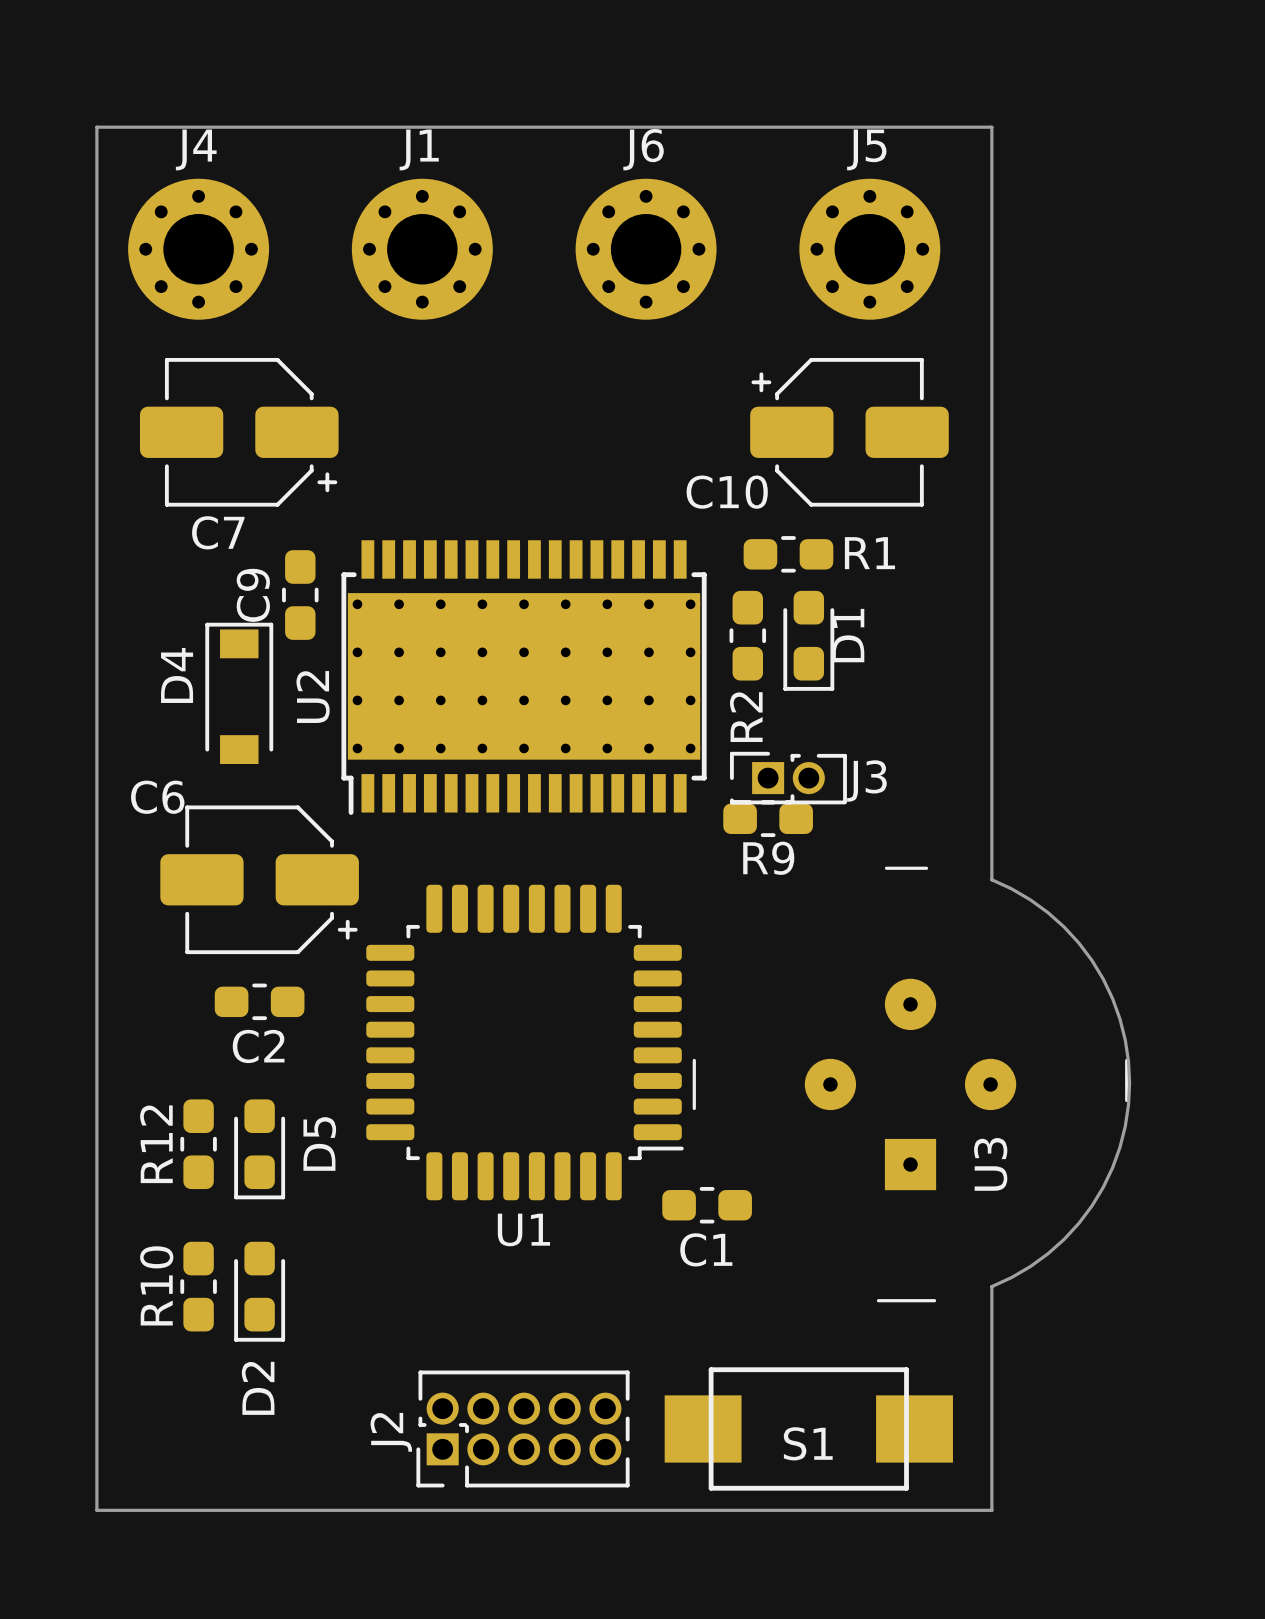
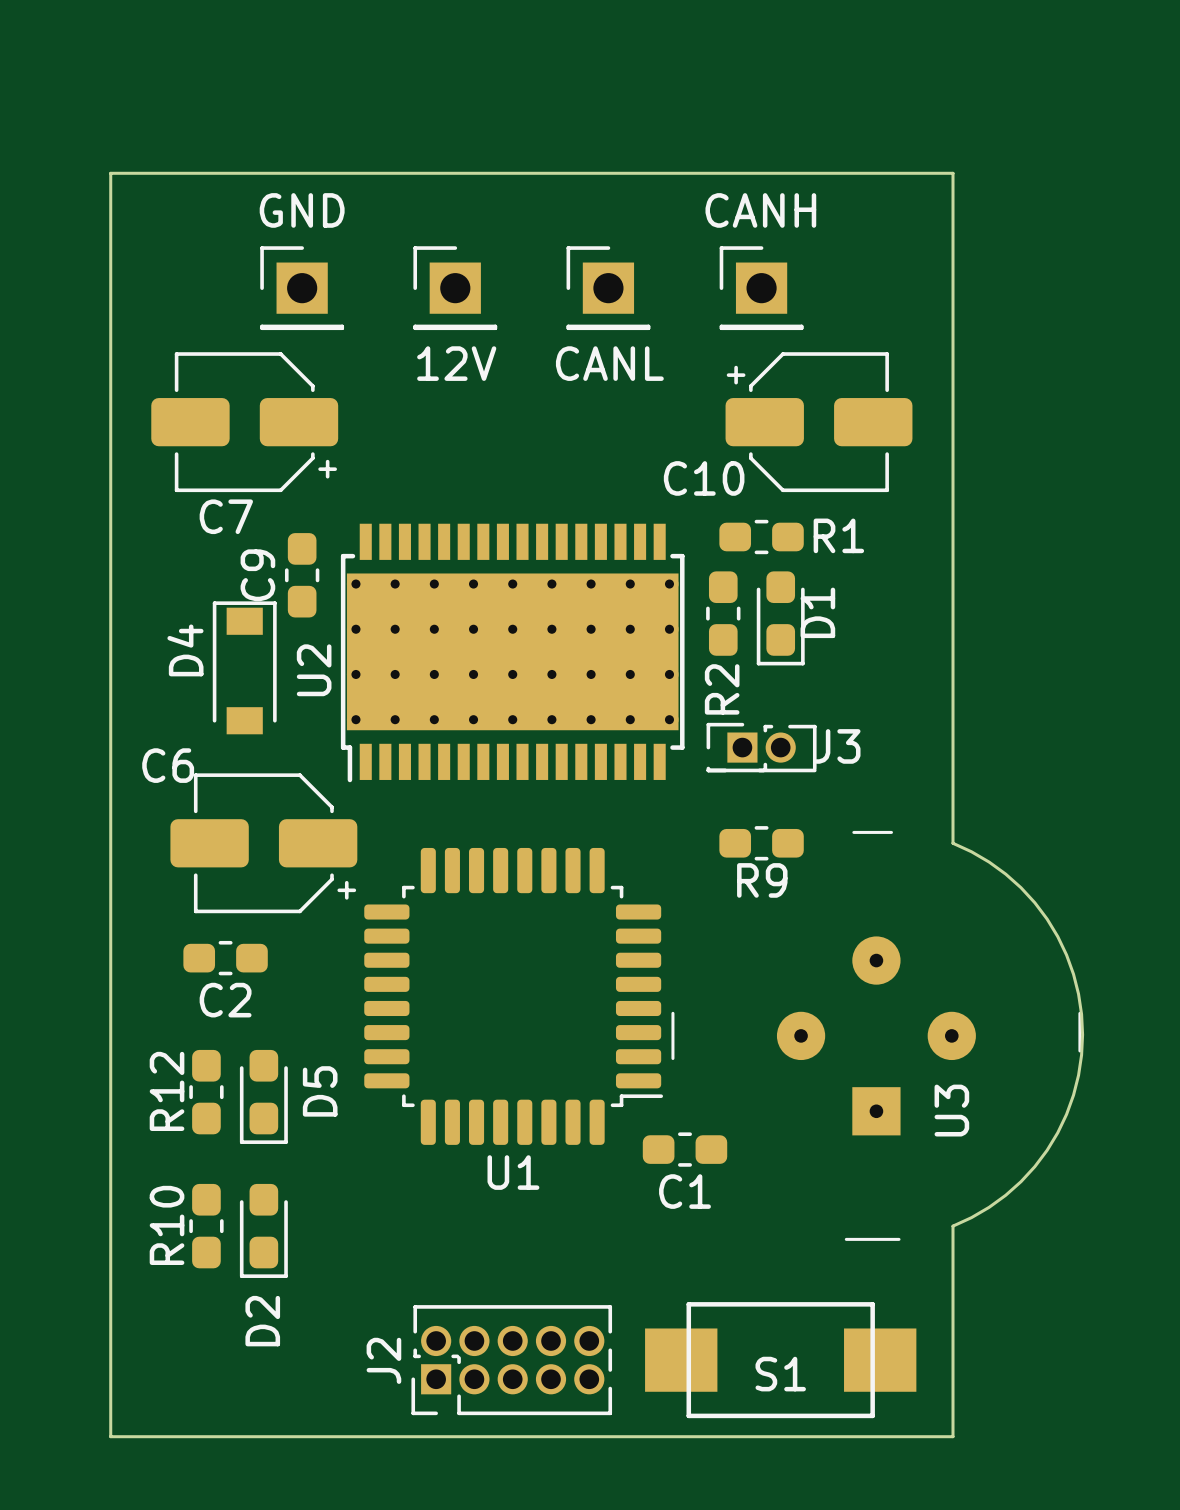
board edge: (96, 167) (96, 127) (991, 127) (991, 167) -> (110, 173) (953, 173)
J4: (198, 249) -> none
J1: (422, 249) -> none
J6: (646, 249) -> none
J5: (869, 249) -> none
GND: none -> (302, 288)
12V: none -> (455, 288)
CANL: none -> (608, 288)
CANH: none -> (761, 288)
R9 position: (768, 818) -> (761, 843)
C2 position: (259, 1001) -> (225, 958)

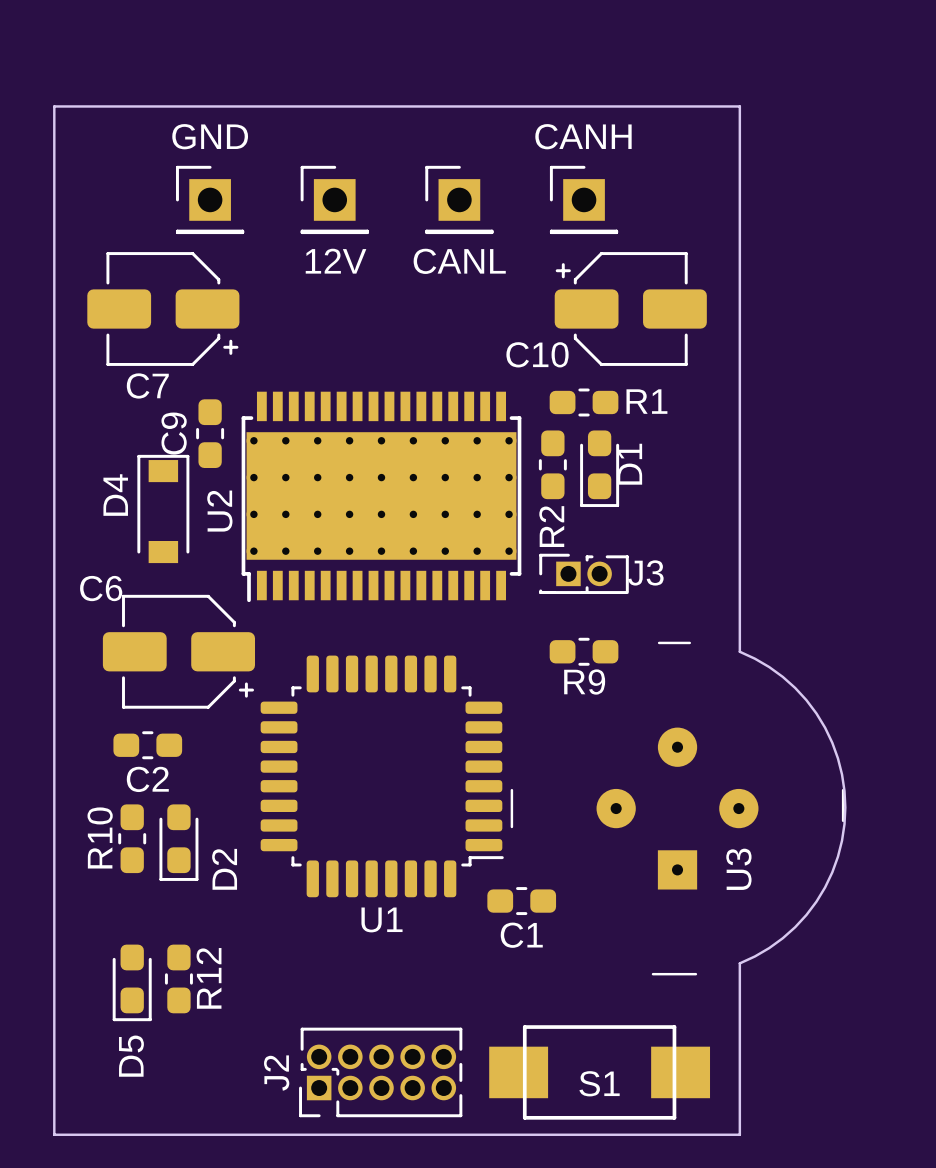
R12 name position: R12 (167, 1091) -> R12 (209, 978)
D5 name position: D5 (320, 1091) -> D5 (131, 1056)
R12 position: (206, 1092) -> (178, 978)
D5 position: (263, 1096) -> (132, 982)
R10 position: (206, 1226) -> (132, 838)
D2 position: (263, 1230) -> (178, 842)
D2 name position: D2 (262, 1321) -> D2 (224, 869)

